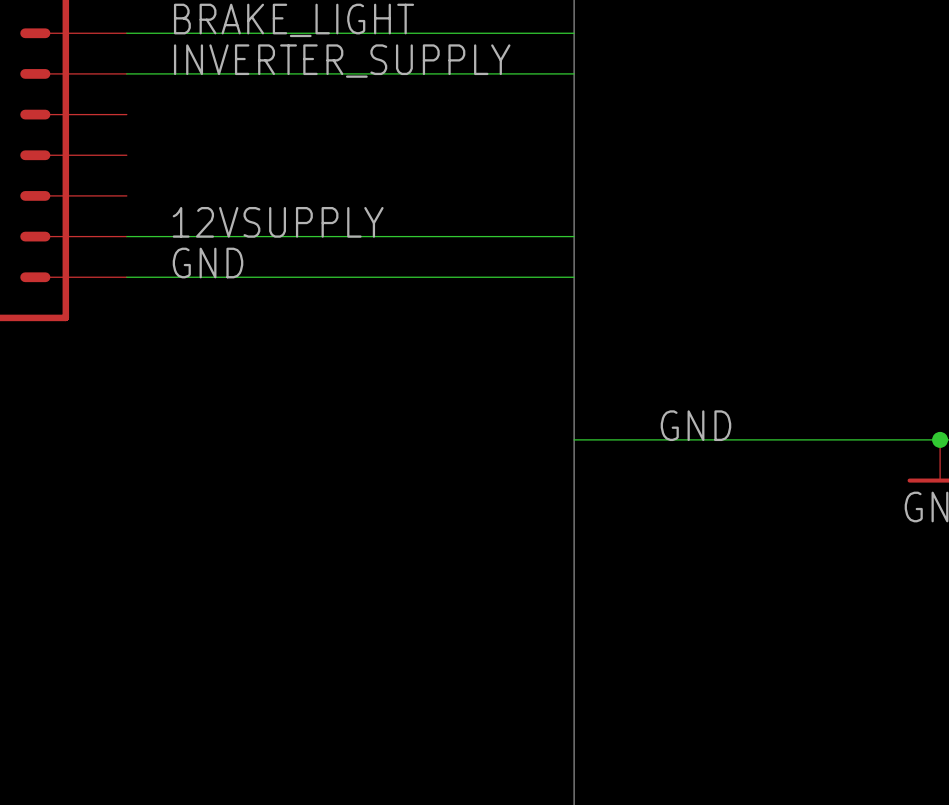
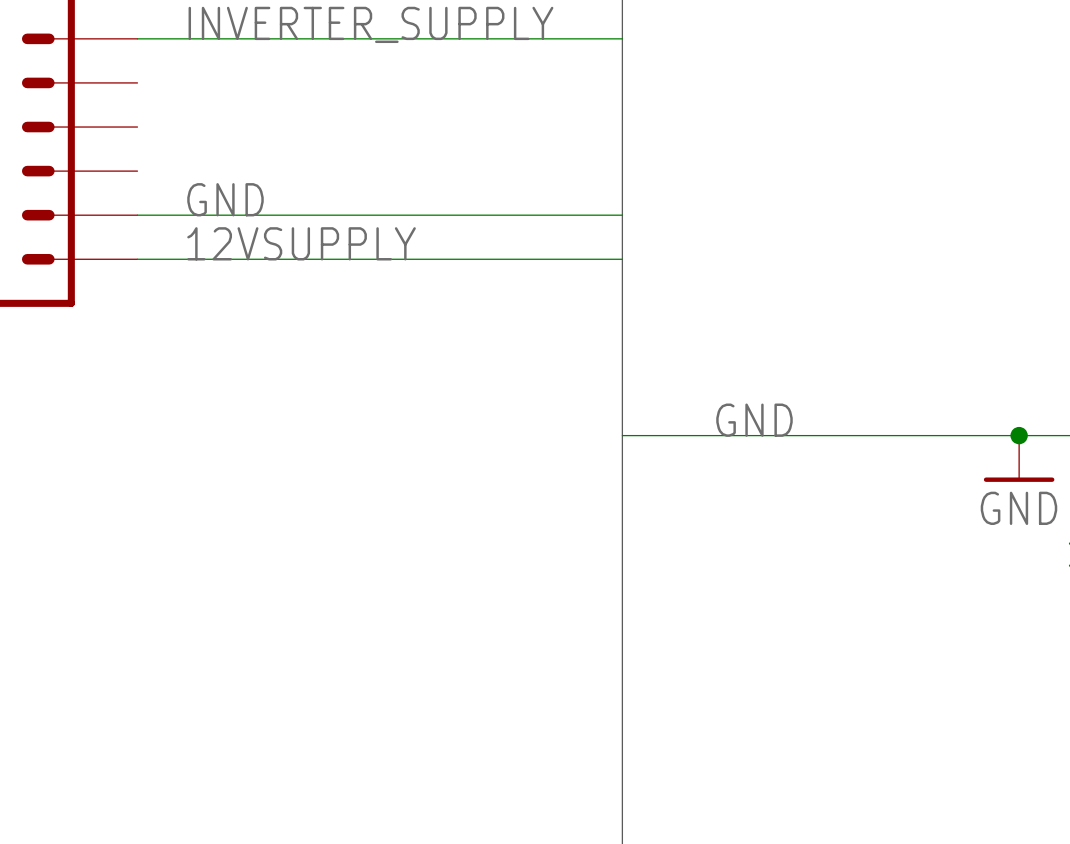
label: 12VSUPPLY (278, 222) -> GND (225, 199)
label: GND (208, 263) -> 12VSUPPLY (301, 243)

